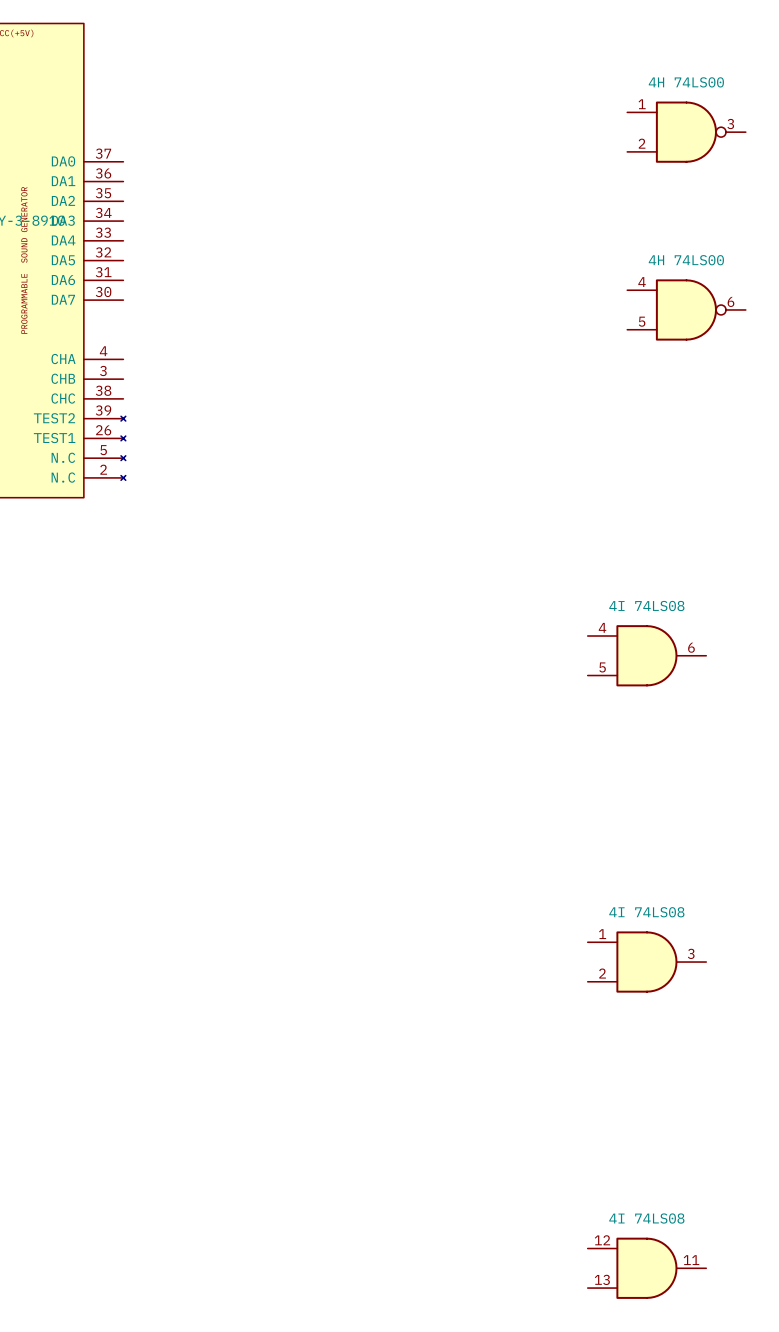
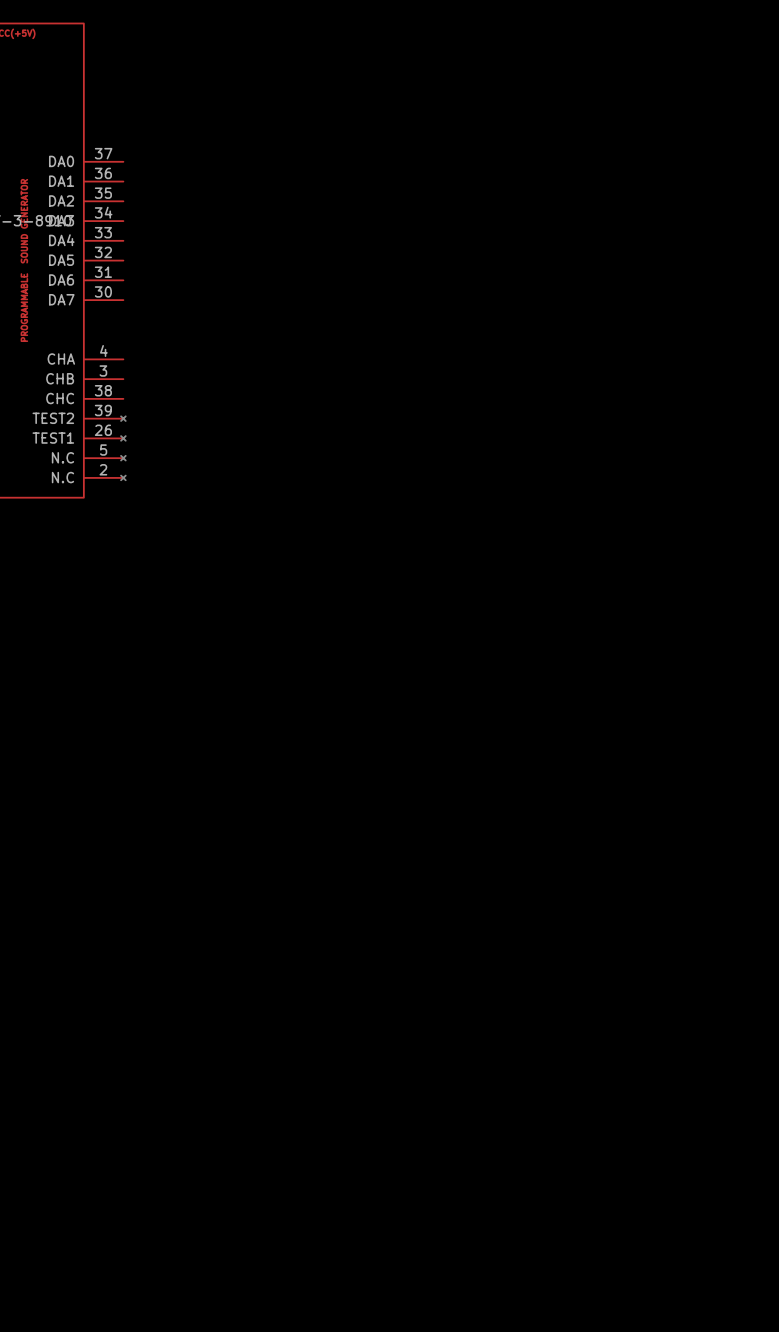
part: 4H 74LS00 (686, 132) -> none
part: 4H 74LS00 (686, 309) -> none
part: 4I 74LS08 (647, 655) -> none
part: 4I 74LS08 (647, 962) -> none
part: 4I 74LS08 (647, 1268) -> none

